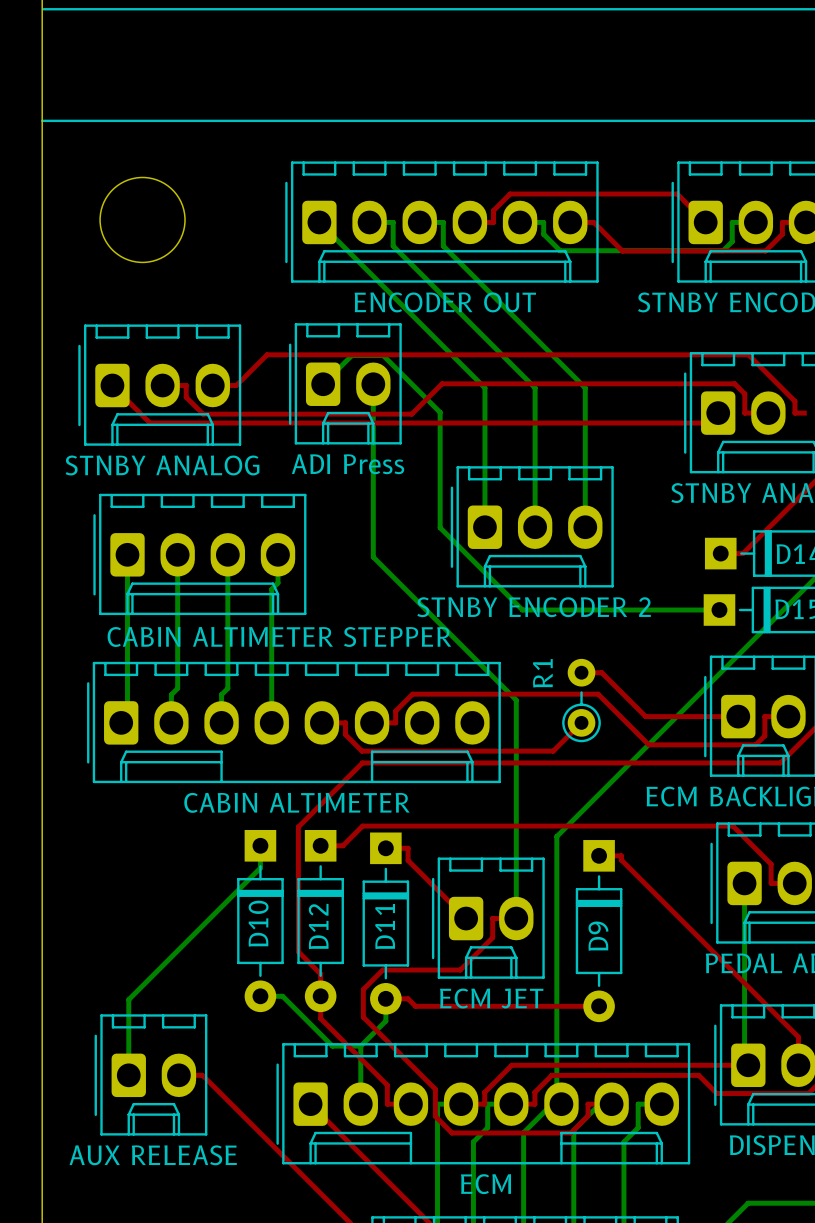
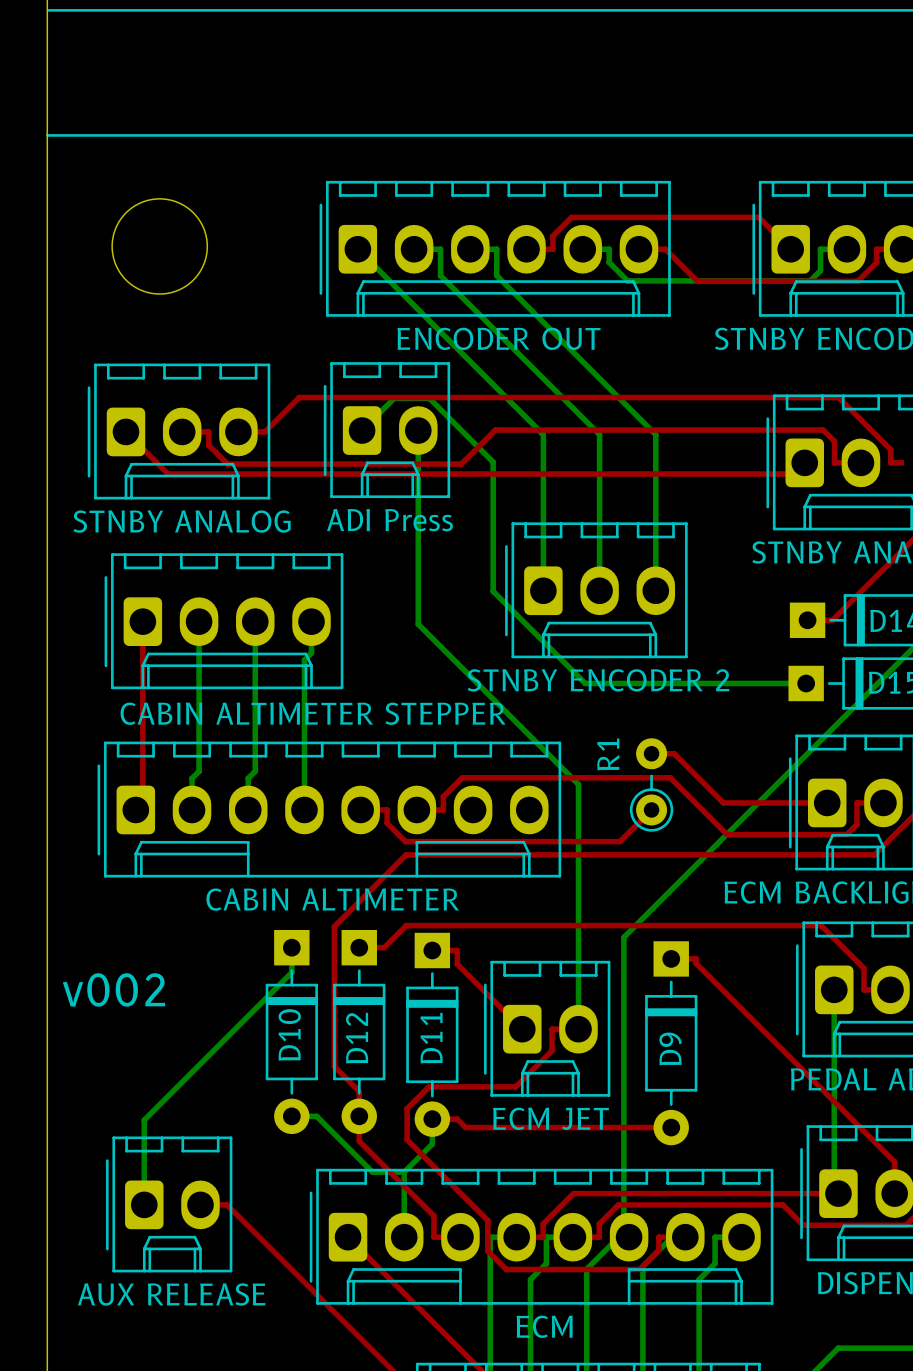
bottom track: (127, 554) (127, 716) (121, 722) -> none
top track: none -> (142, 621) (142, 802) (135, 809)
text: none -> v002 (113, 989)

